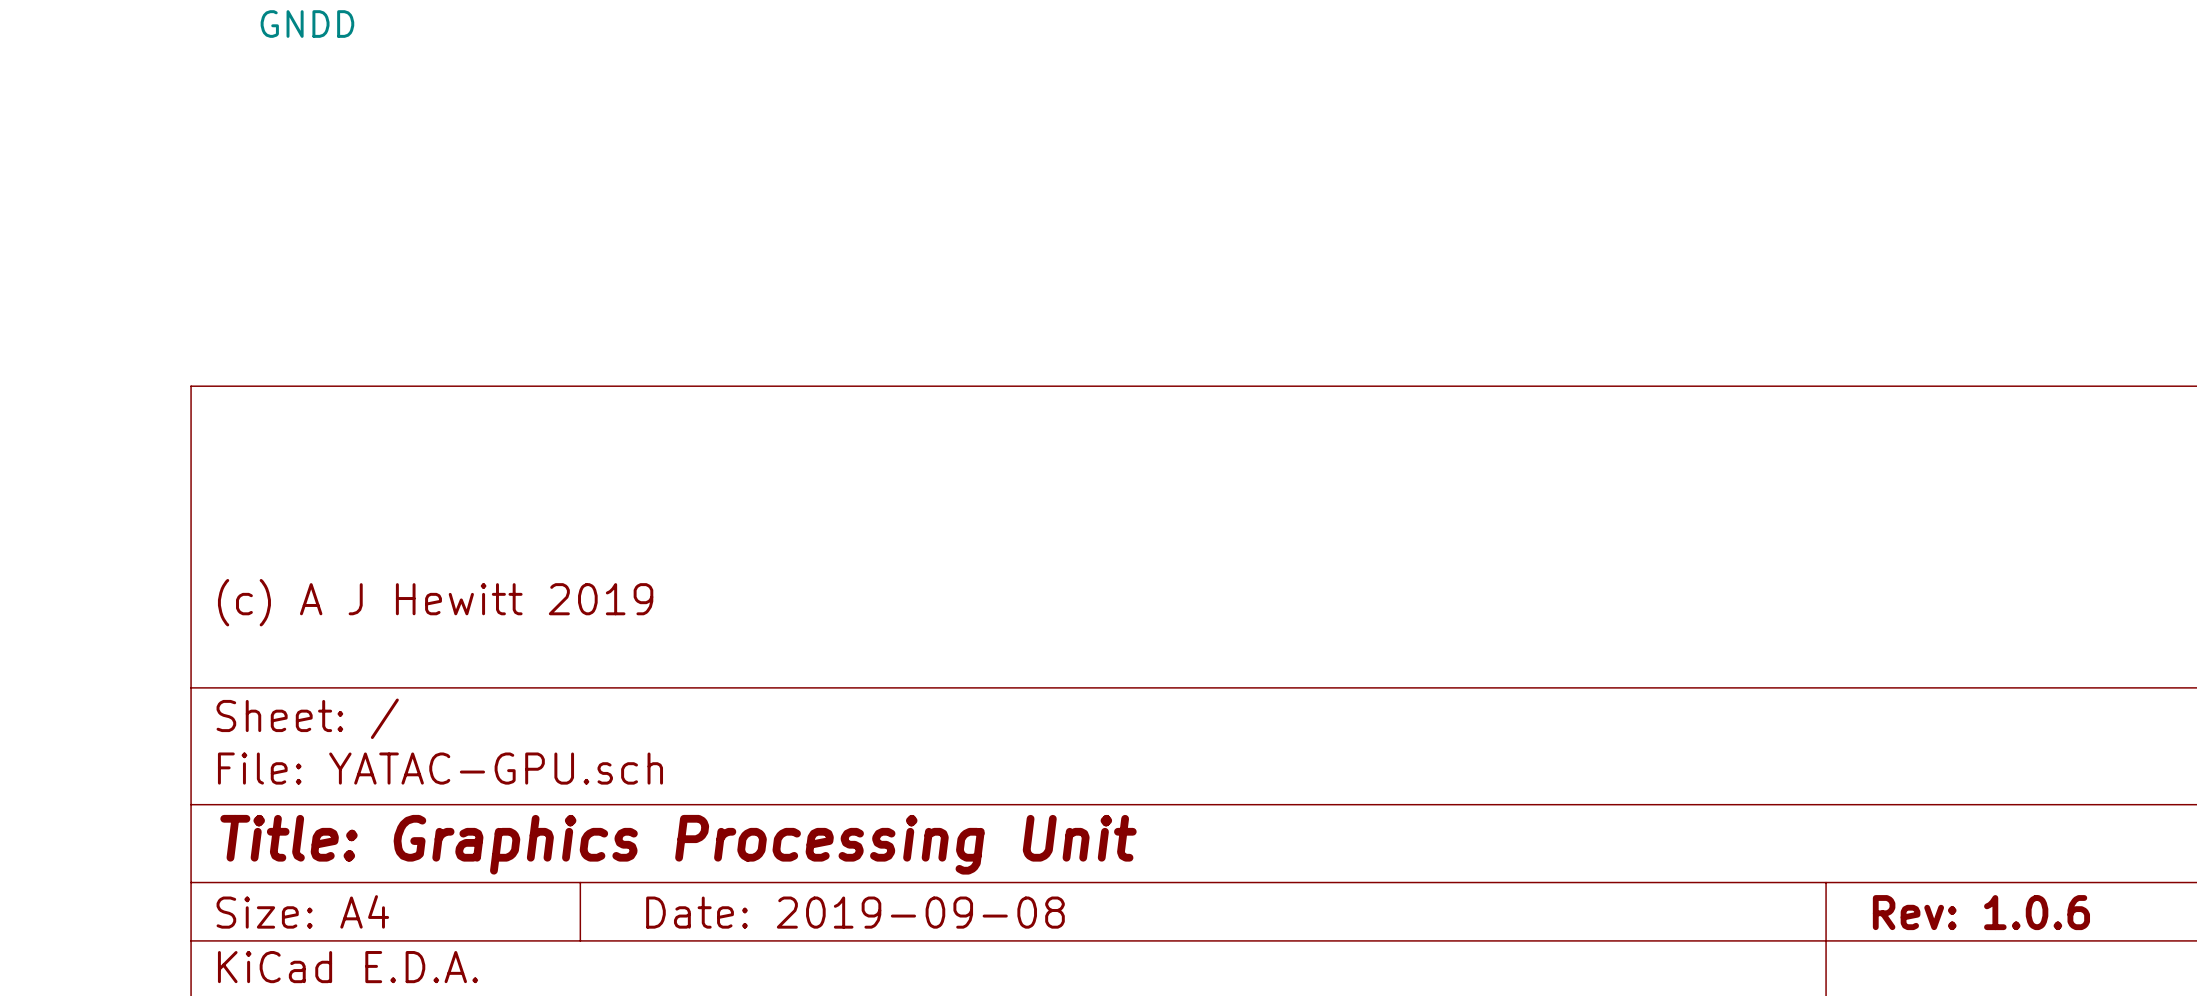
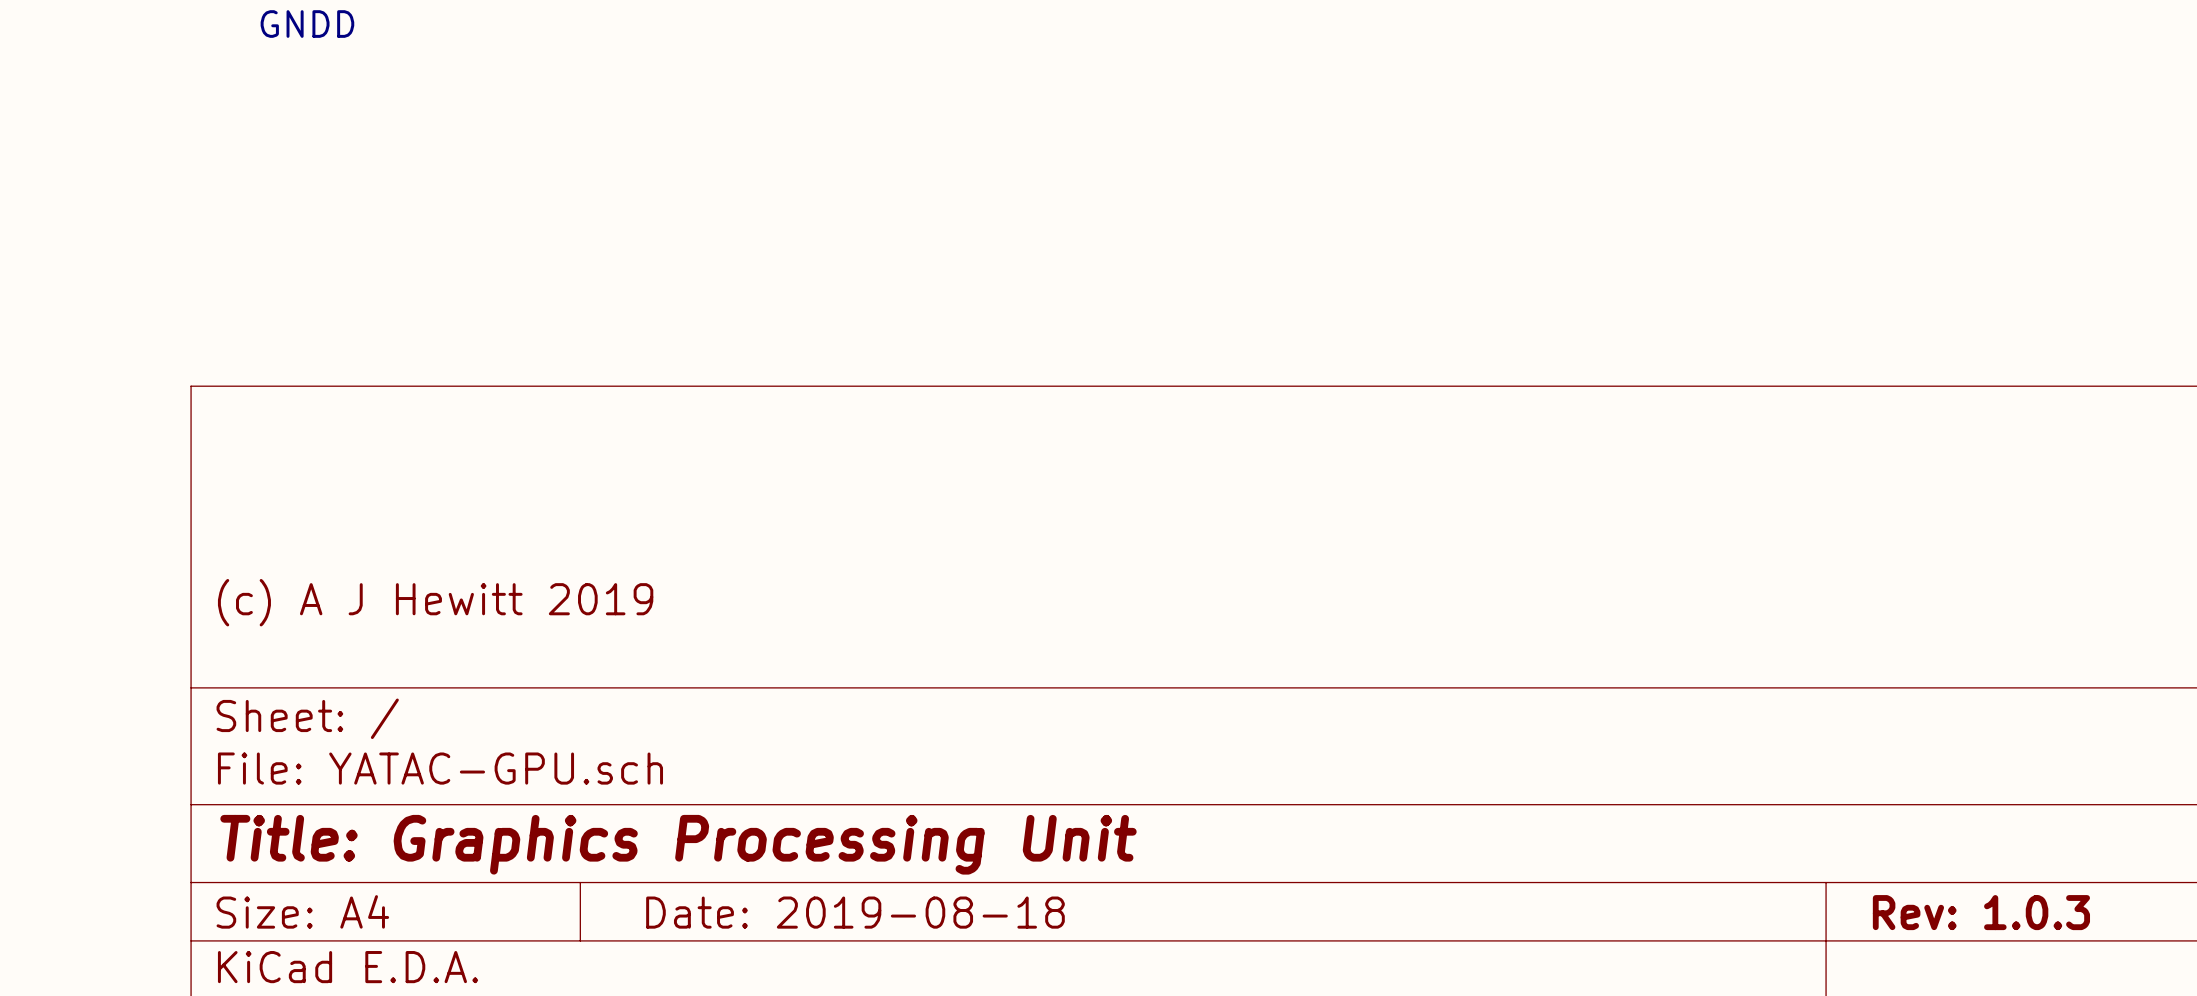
title block: Date: 2019-09-08 (855, 912) -> Date: 2019-08-18 (855, 912)
title block: Rev: 1.0.6 (1981, 912) -> Rev: 1.0.3 (1981, 912)

